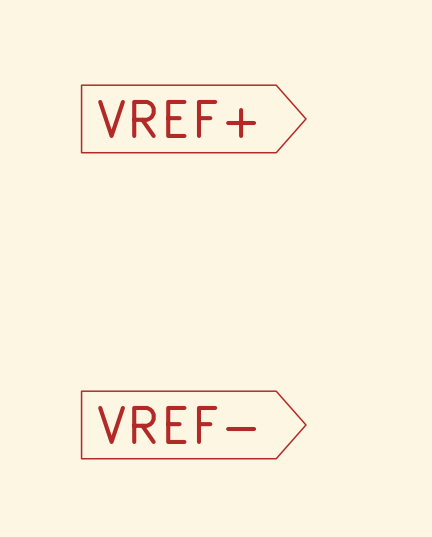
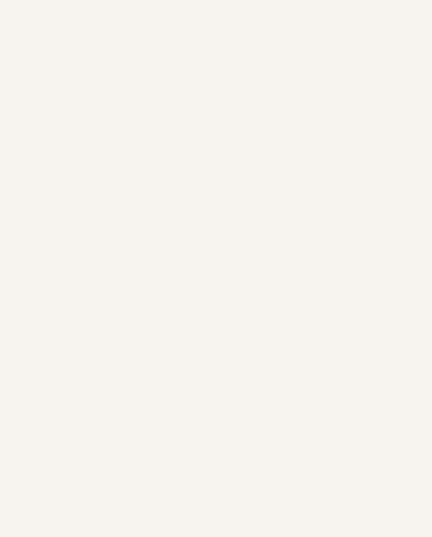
global label: VREF+ (177, 118) -> none
global label: VREF- (177, 424) -> none

